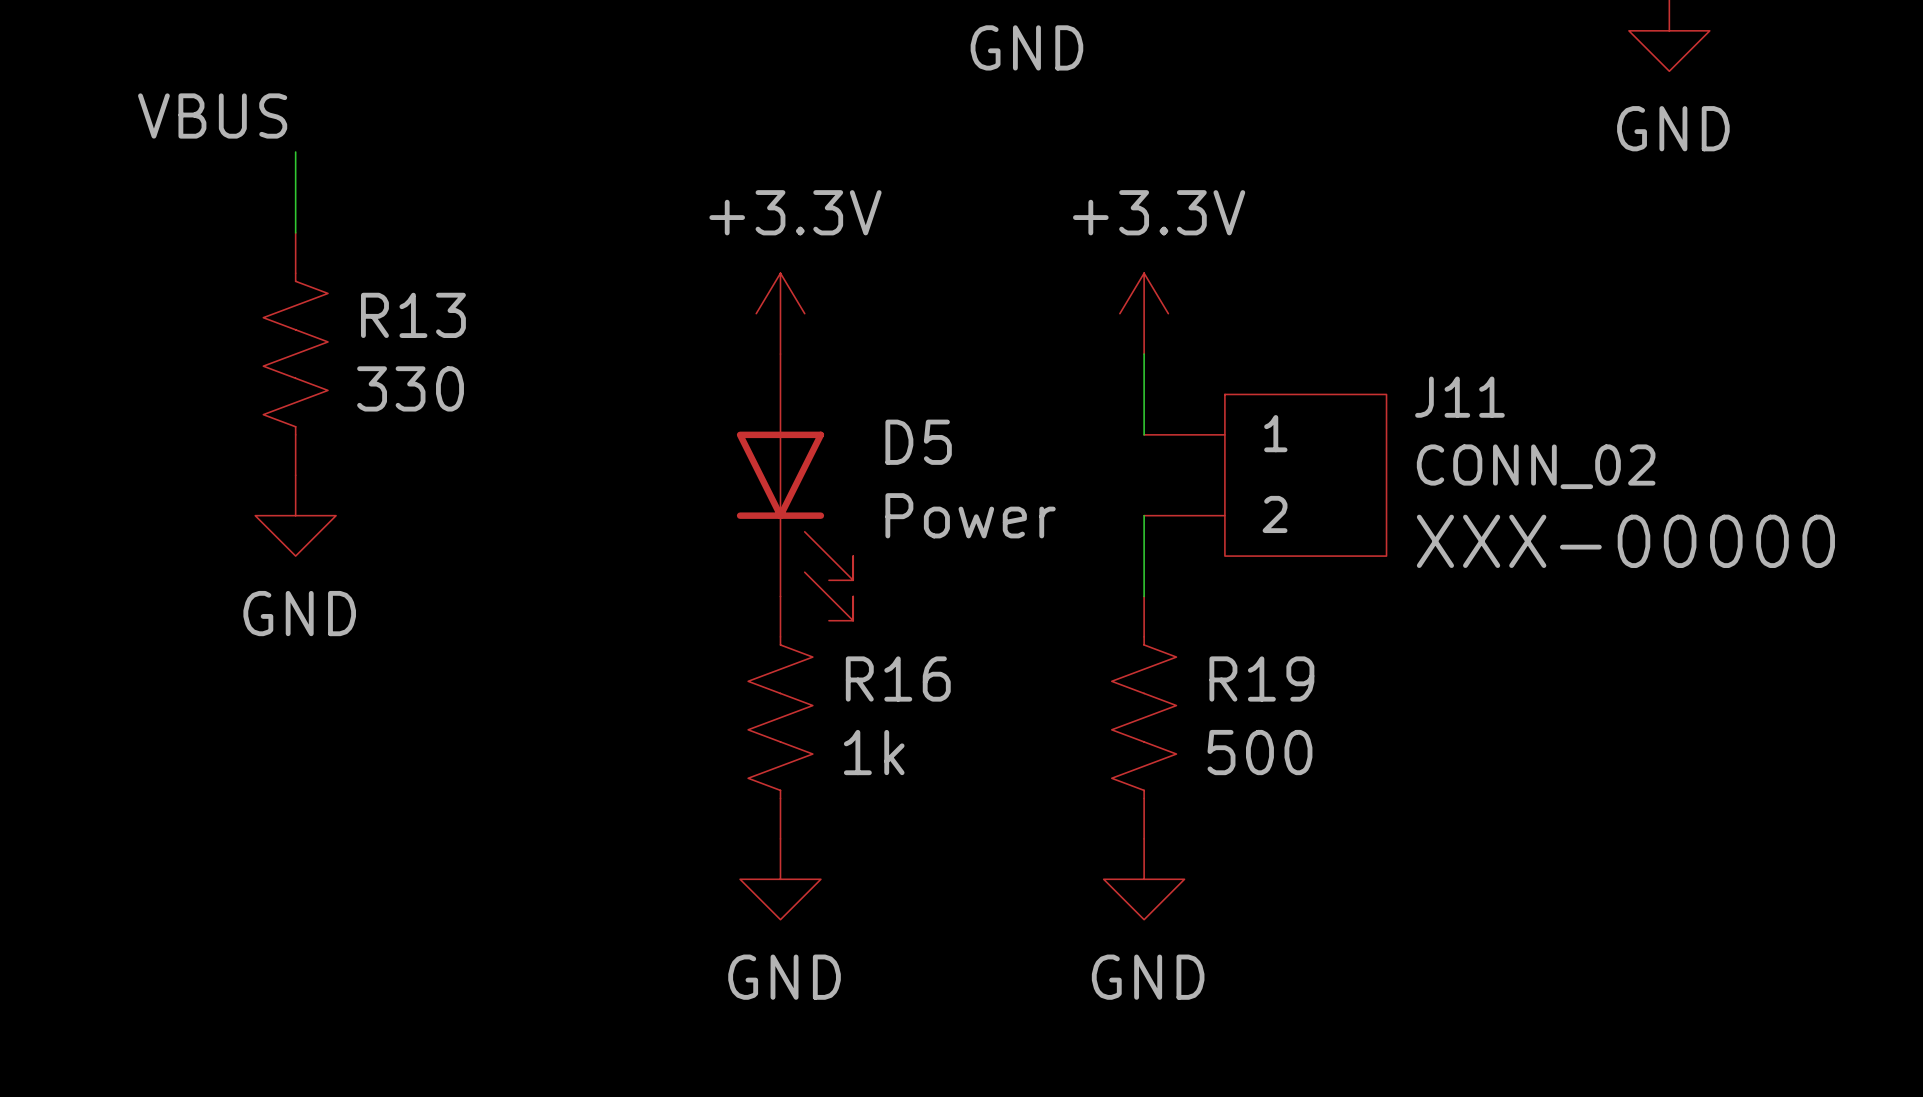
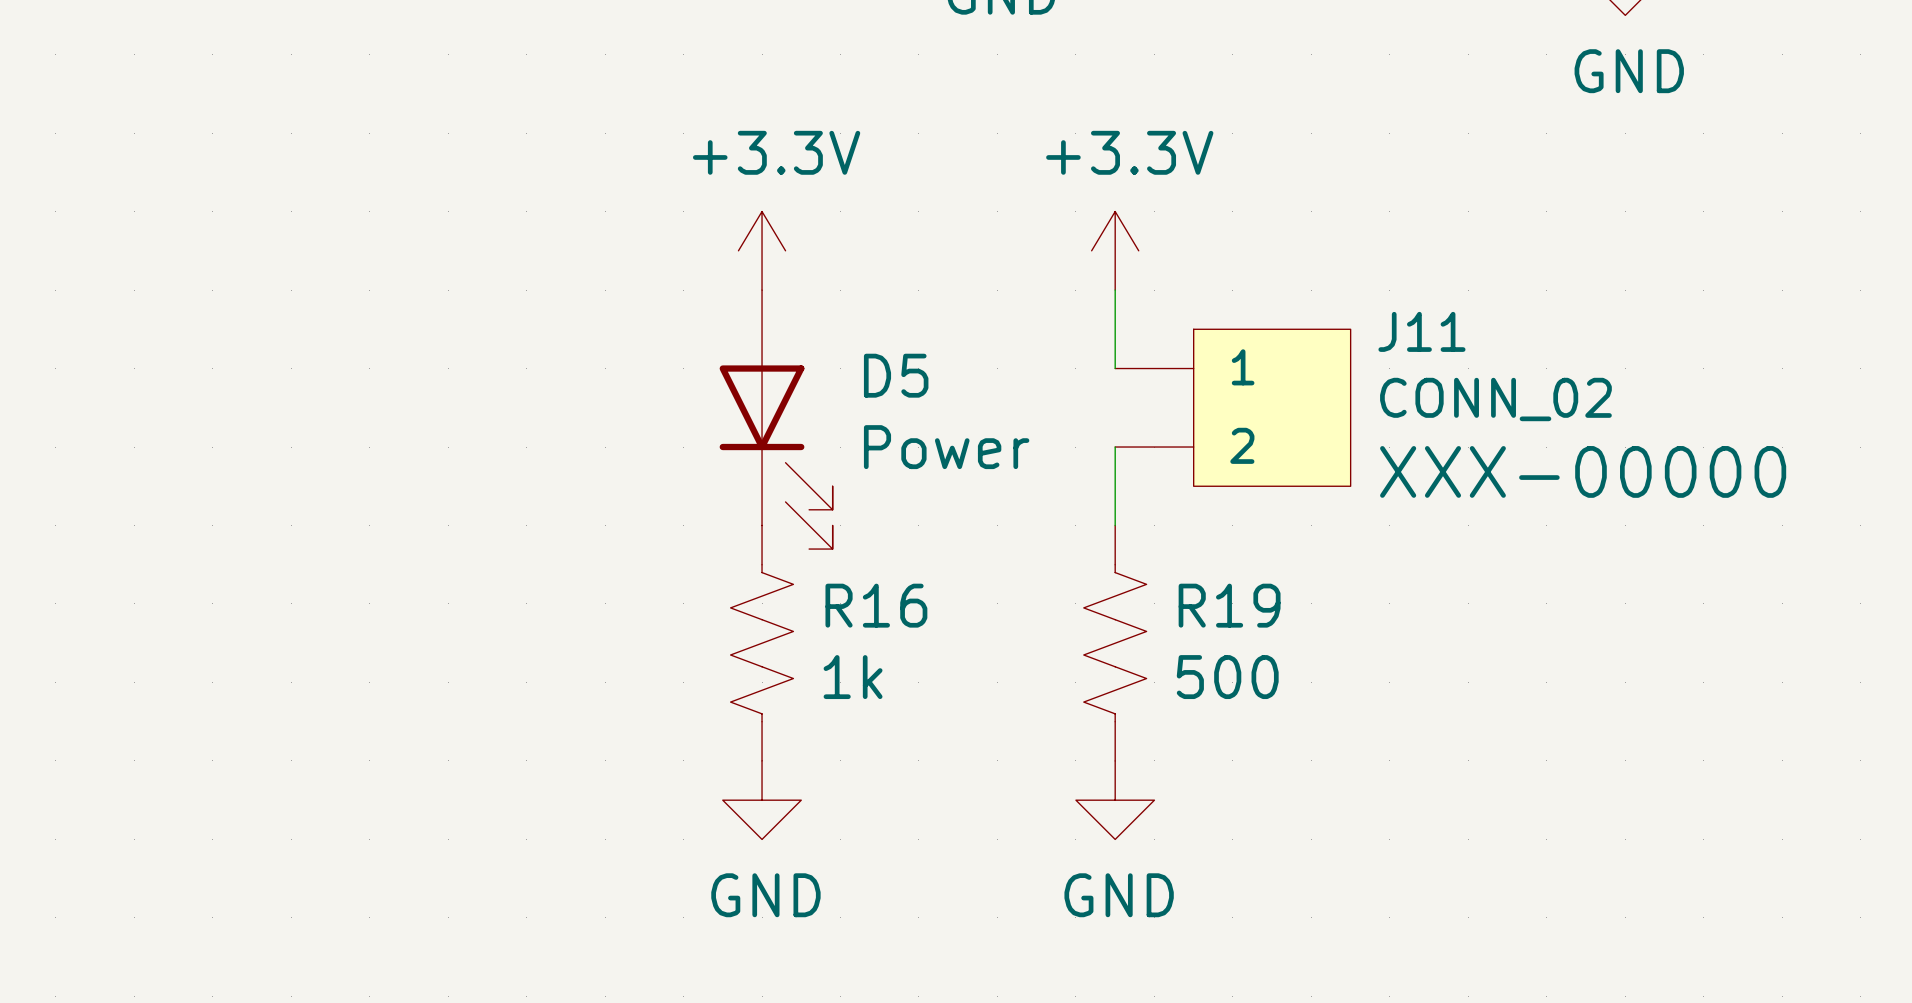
label: VBUS (212, 115) -> none
wire: (295, 152) (295, 232) -> none
R13: 330 (295, 354) -> none
power symbol: GND (295, 515) -> none

